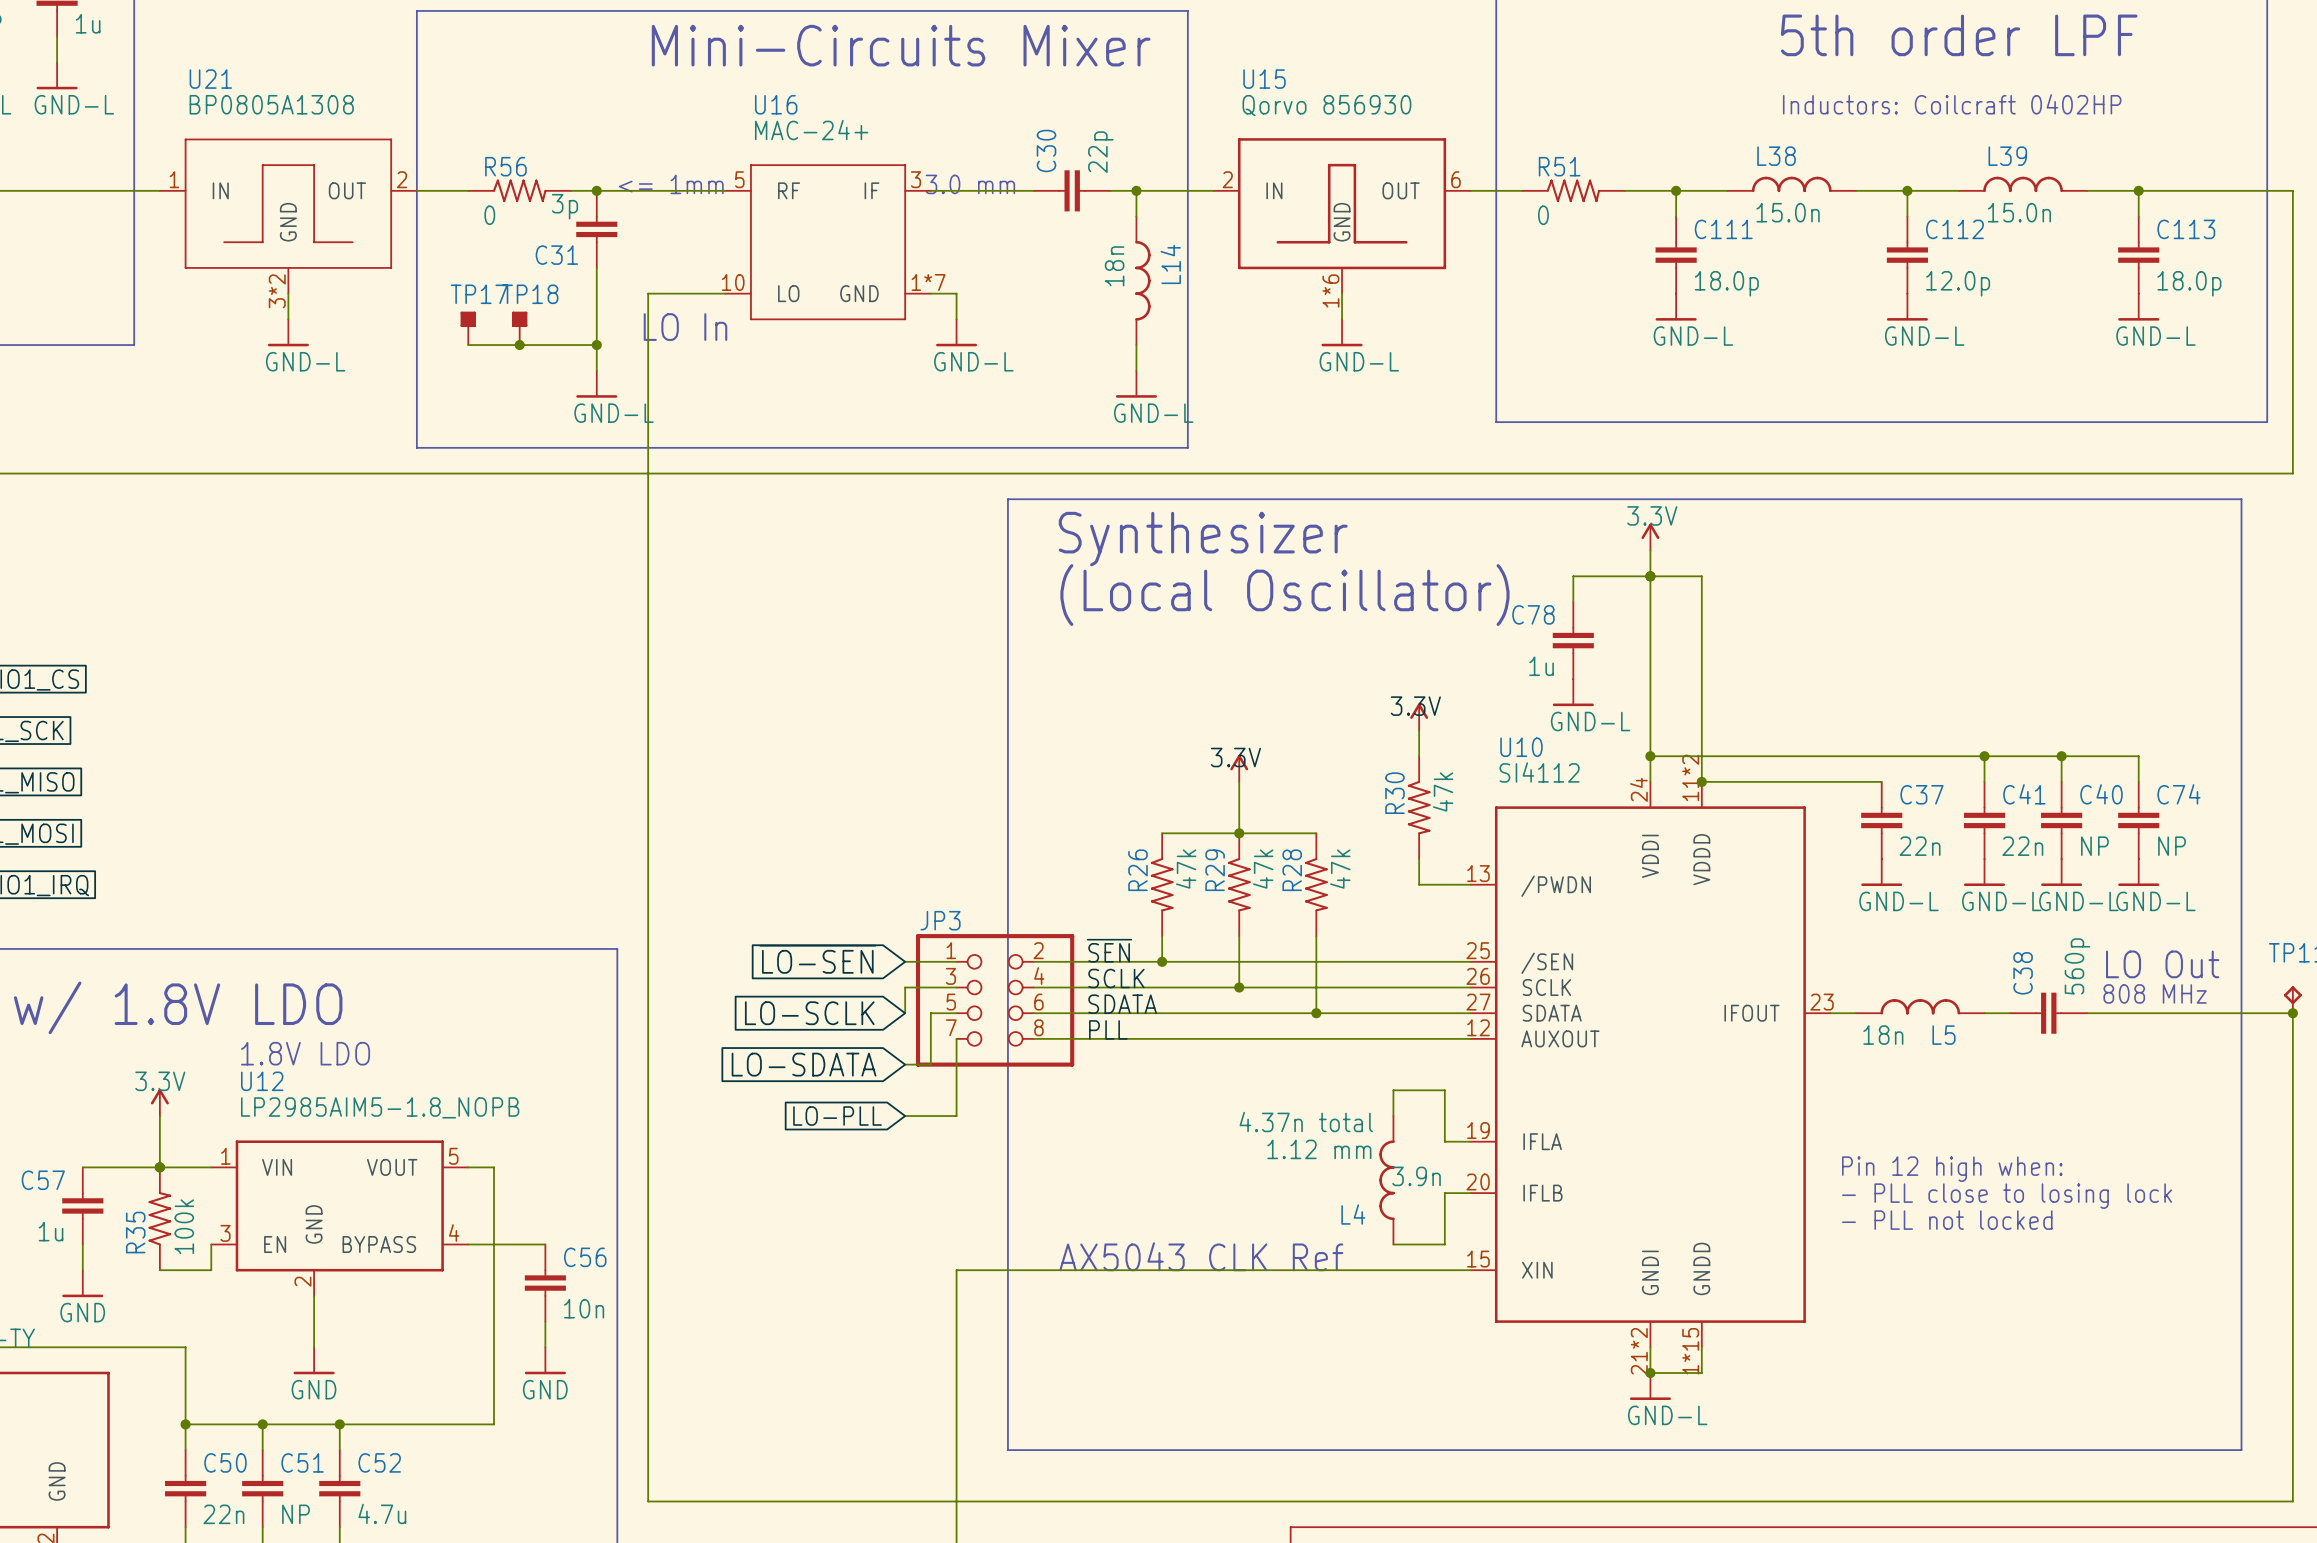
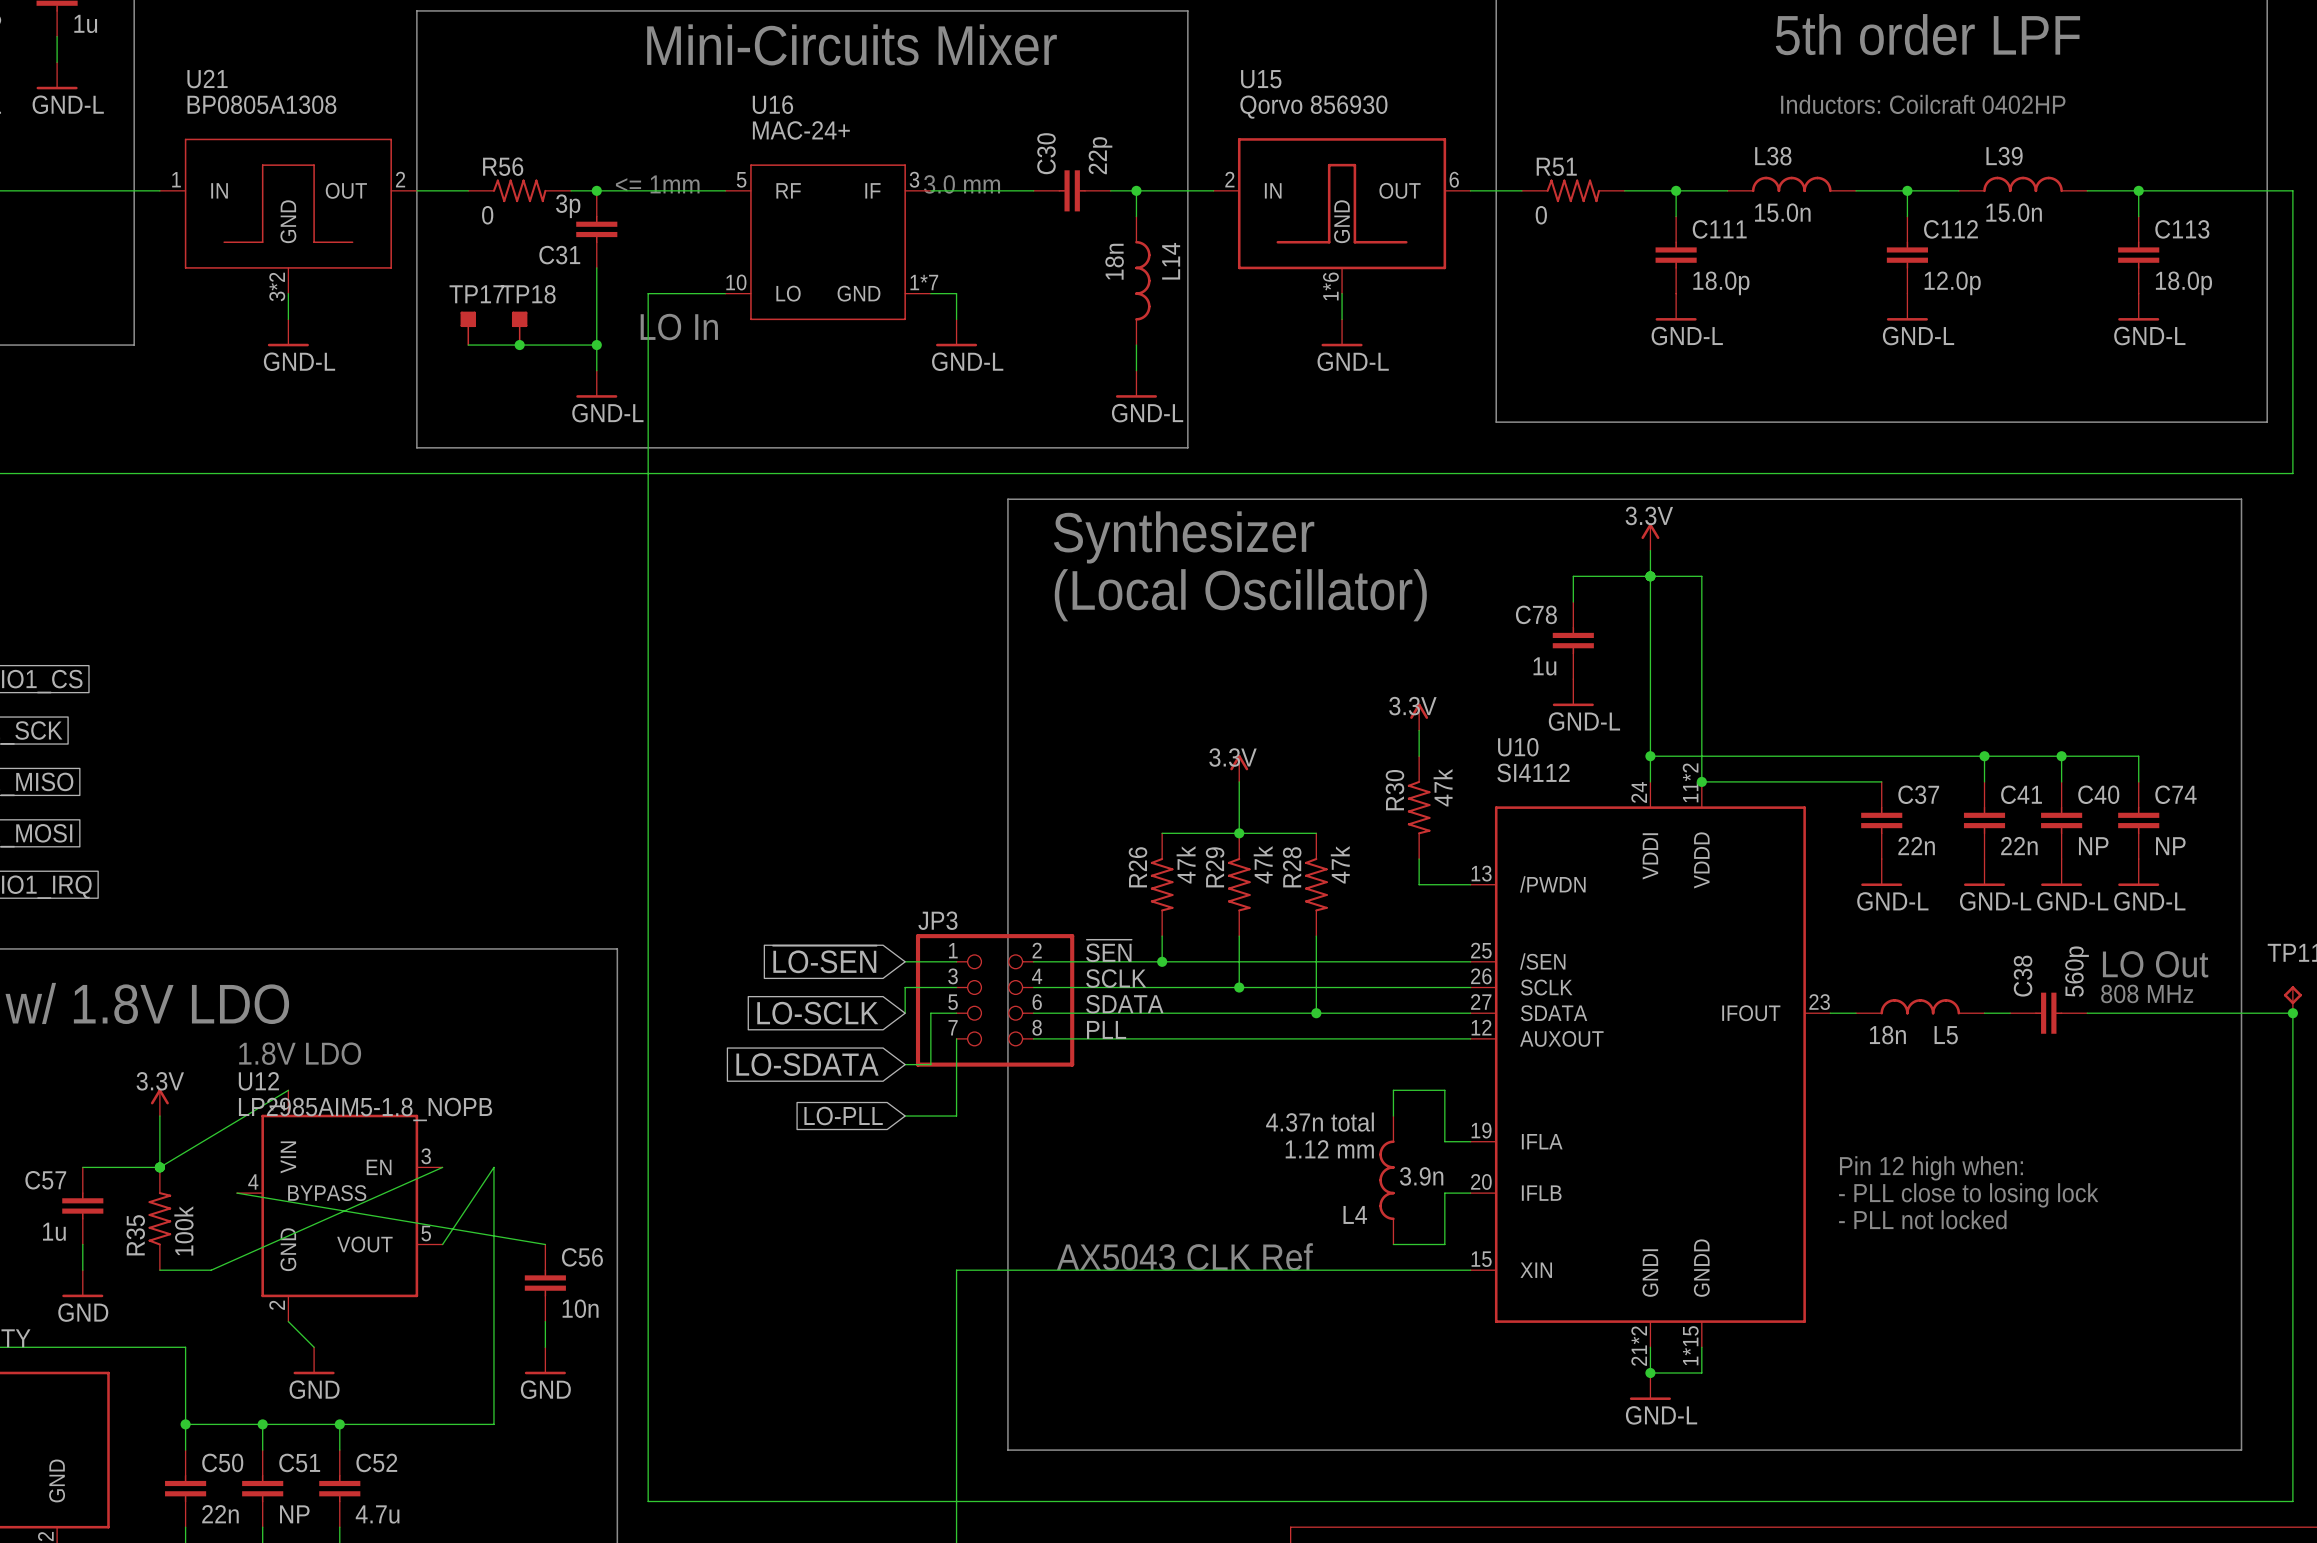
U12 symbol: [211, 1140, 469, 1296] -> [236, 1090, 443, 1322]
wire: (159, 1167) (211, 1167) -> (159, 1167) (288, 1090)
wire: (468, 1167) (493, 1167) -> (442, 1244) (493, 1167)
wire: (211, 1244) (211, 1270) -> (442, 1167) (211, 1270)
wire: (468, 1244) (545, 1244) -> (236, 1193) (545, 1244)
wire: (314, 1295) (314, 1347) -> (288, 1321) (314, 1347)

